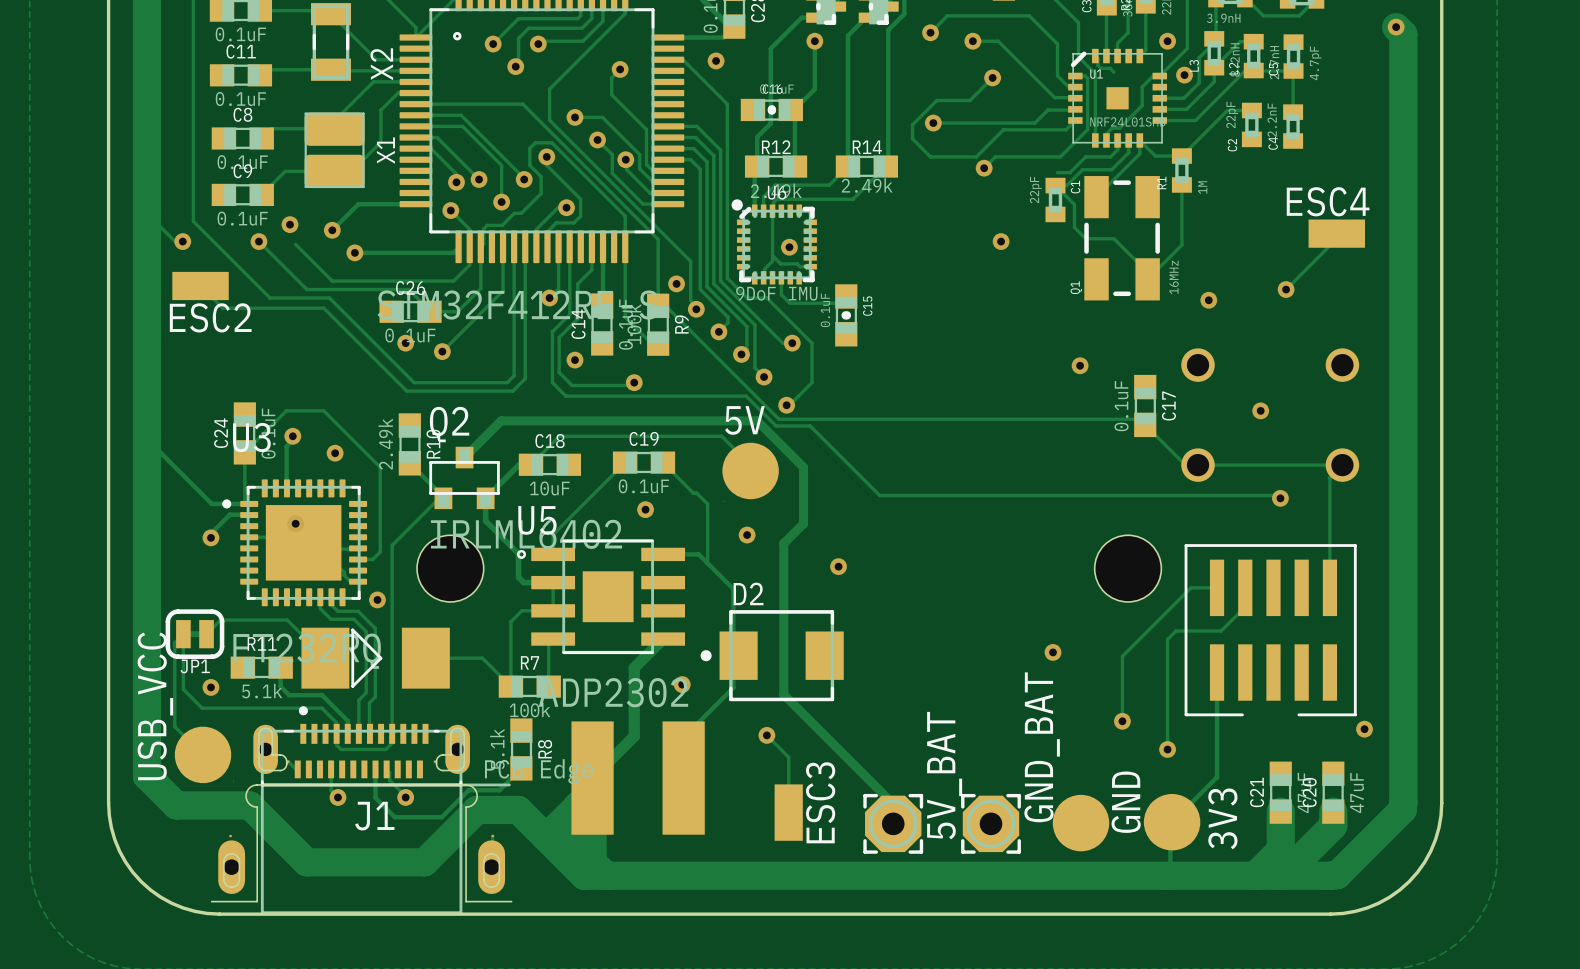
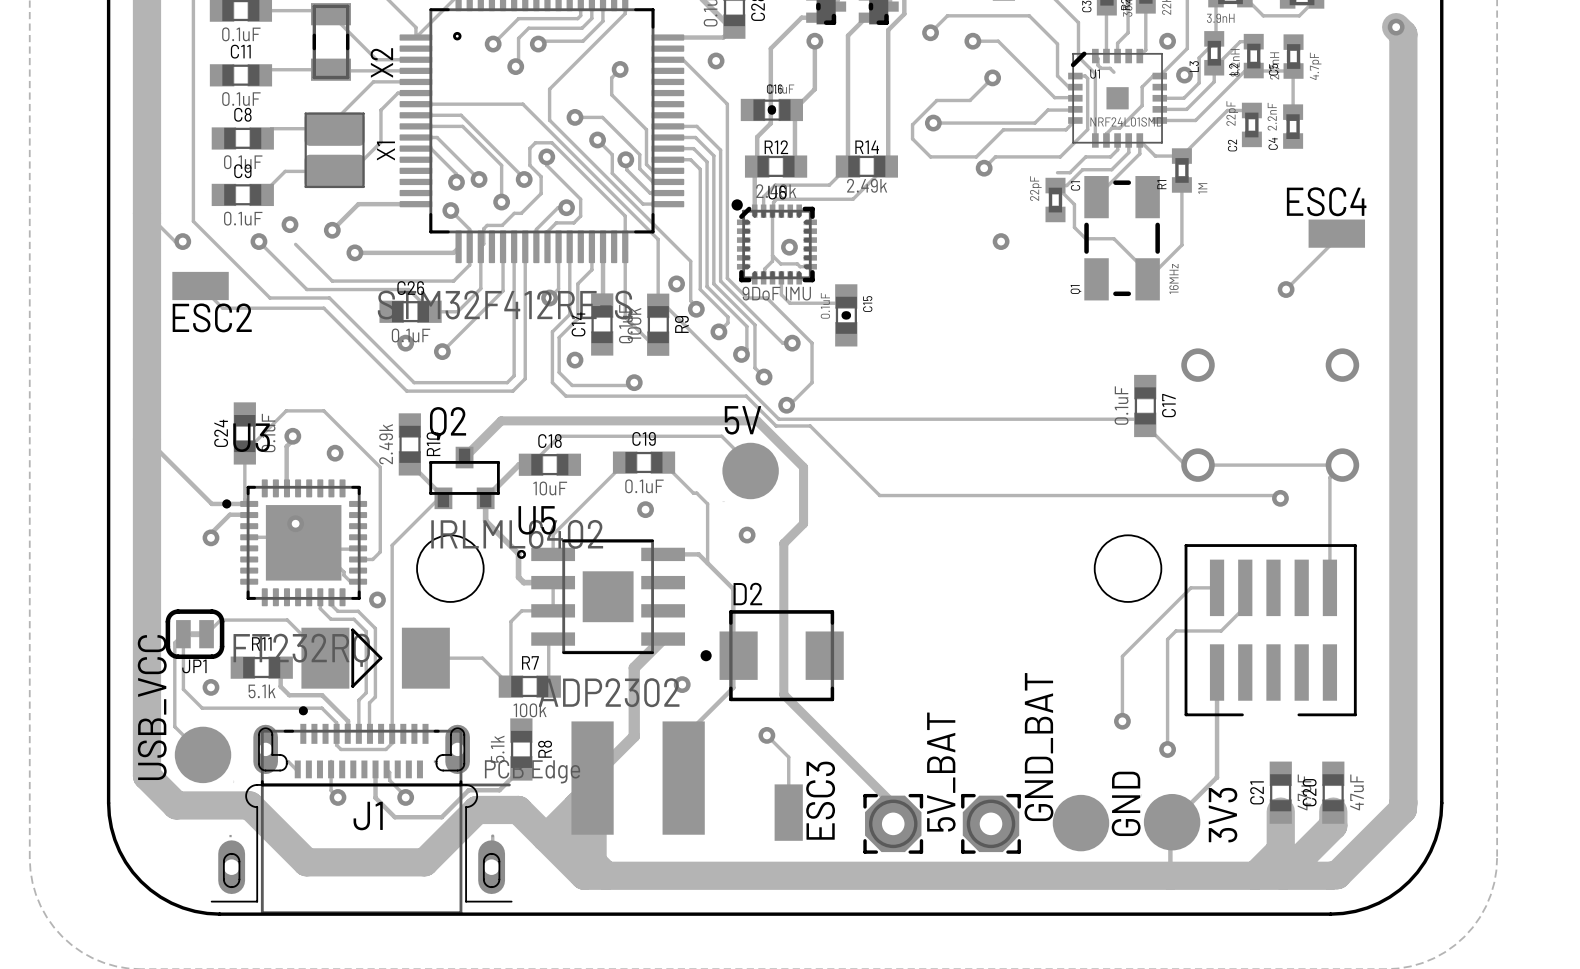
via: (1208, 300) -> none
via: (1080, 365) -> none
via: (1260, 410) -> none
via: (838, 566) -> none
via: (1053, 652) -> none
via: (1364, 729) -> none

